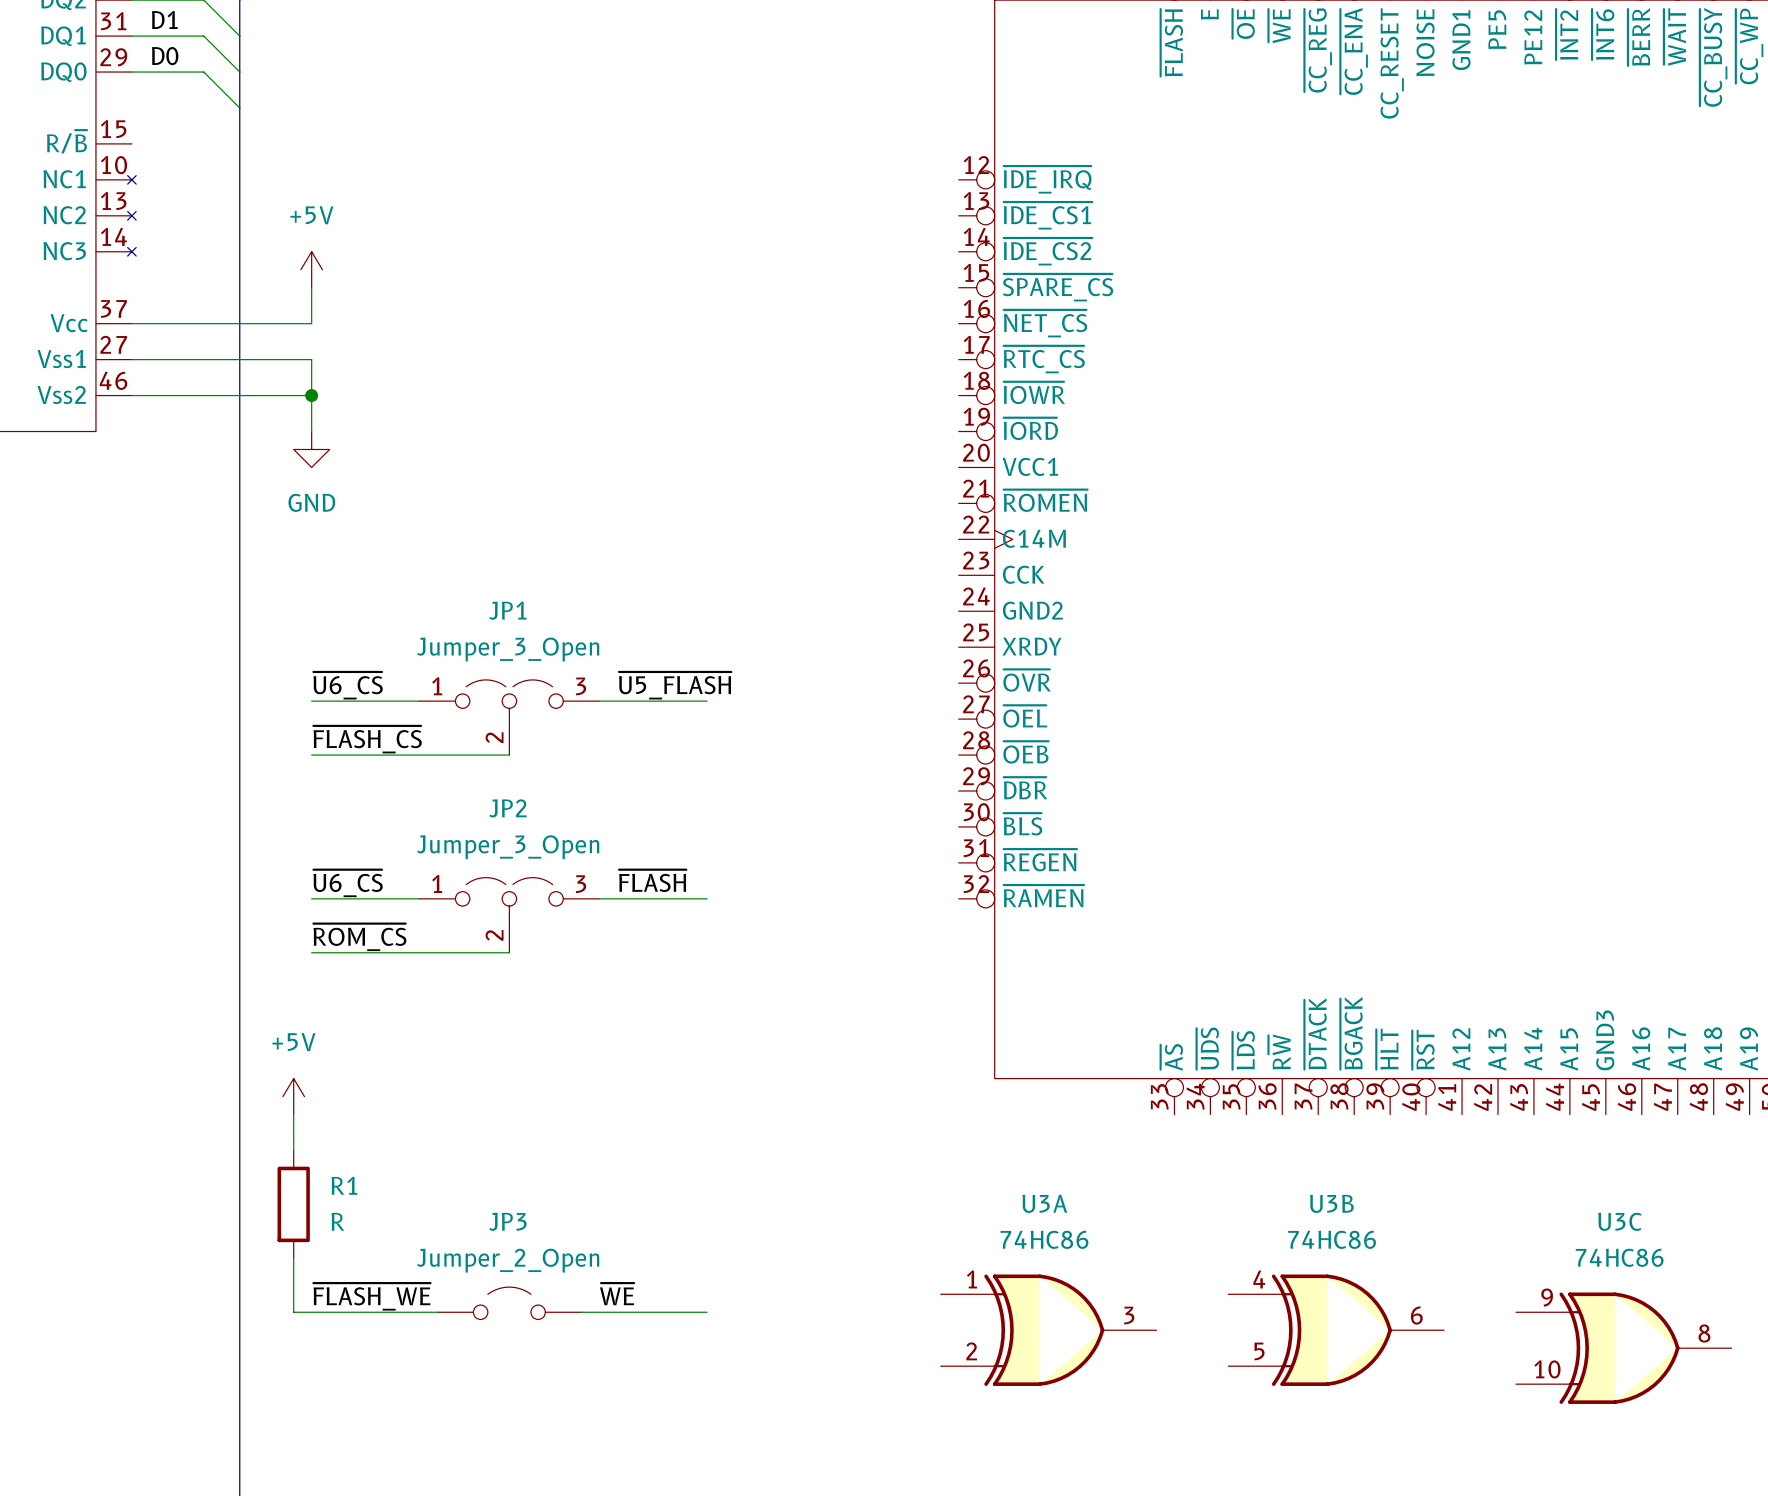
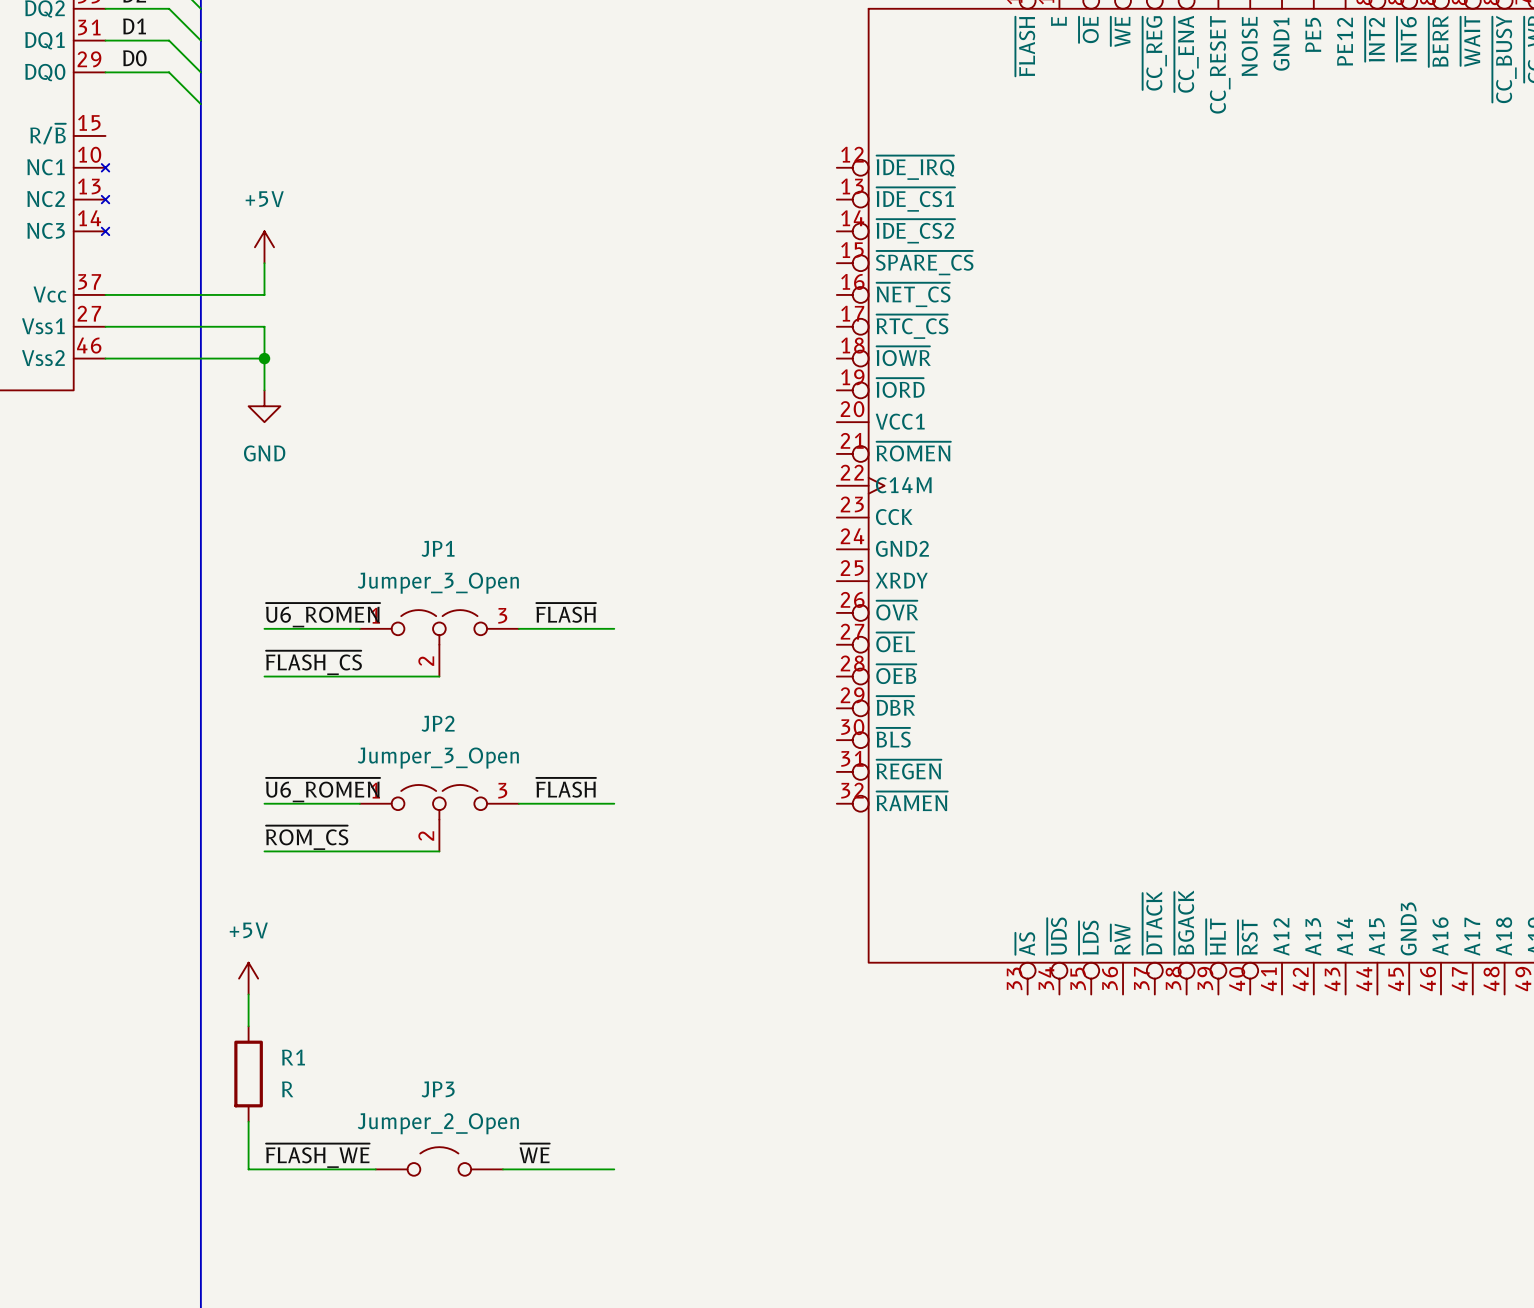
label: ~{U6_CS} (348, 685) -> ~{U6_ROMEN} (323, 615)
label: ~{U5_FLASH} (675, 685) -> ~{FLASH} (566, 612)
label: ~{U6_CS} (348, 883) -> ~{U6_ROMEN} (323, 790)
U3A: 74HC86 (1048, 1330) -> none
U3B: 74HC86 (1336, 1330) -> none
U3C: 74HC86 (1623, 1348) -> none

